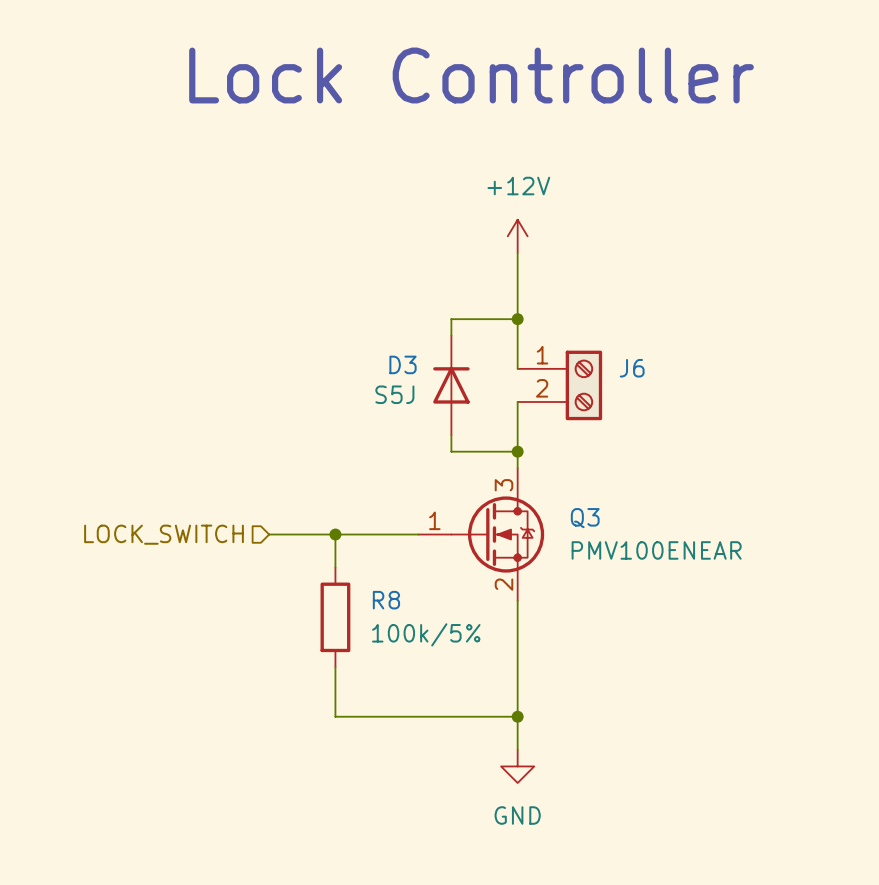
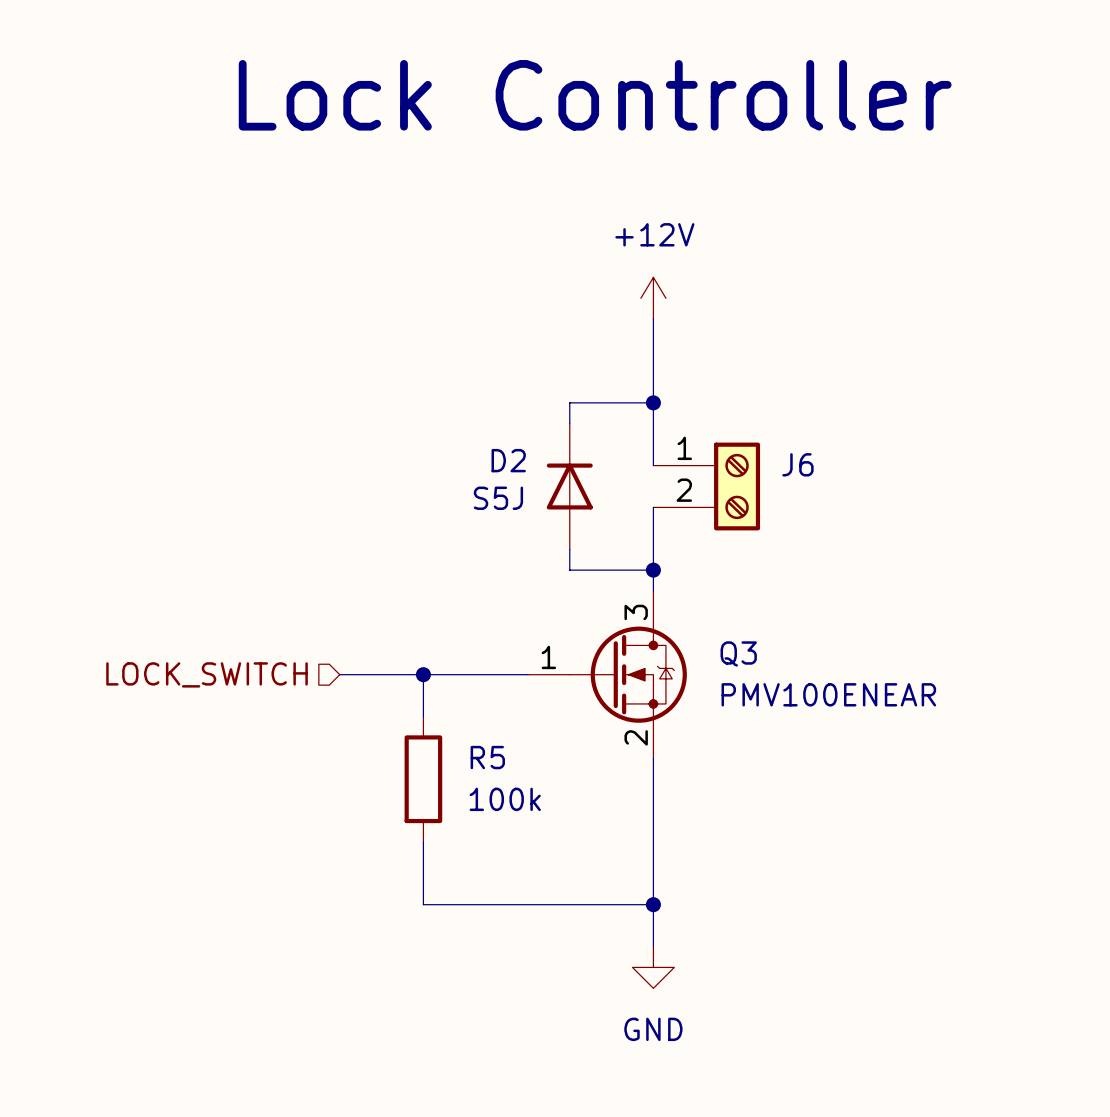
D3 name: D3 (403, 364) -> D2 (508, 460)
R8 name: R8 (386, 600) -> R5 (487, 757)
R8 value: 100k/5% (426, 634) -> 100k (505, 799)

